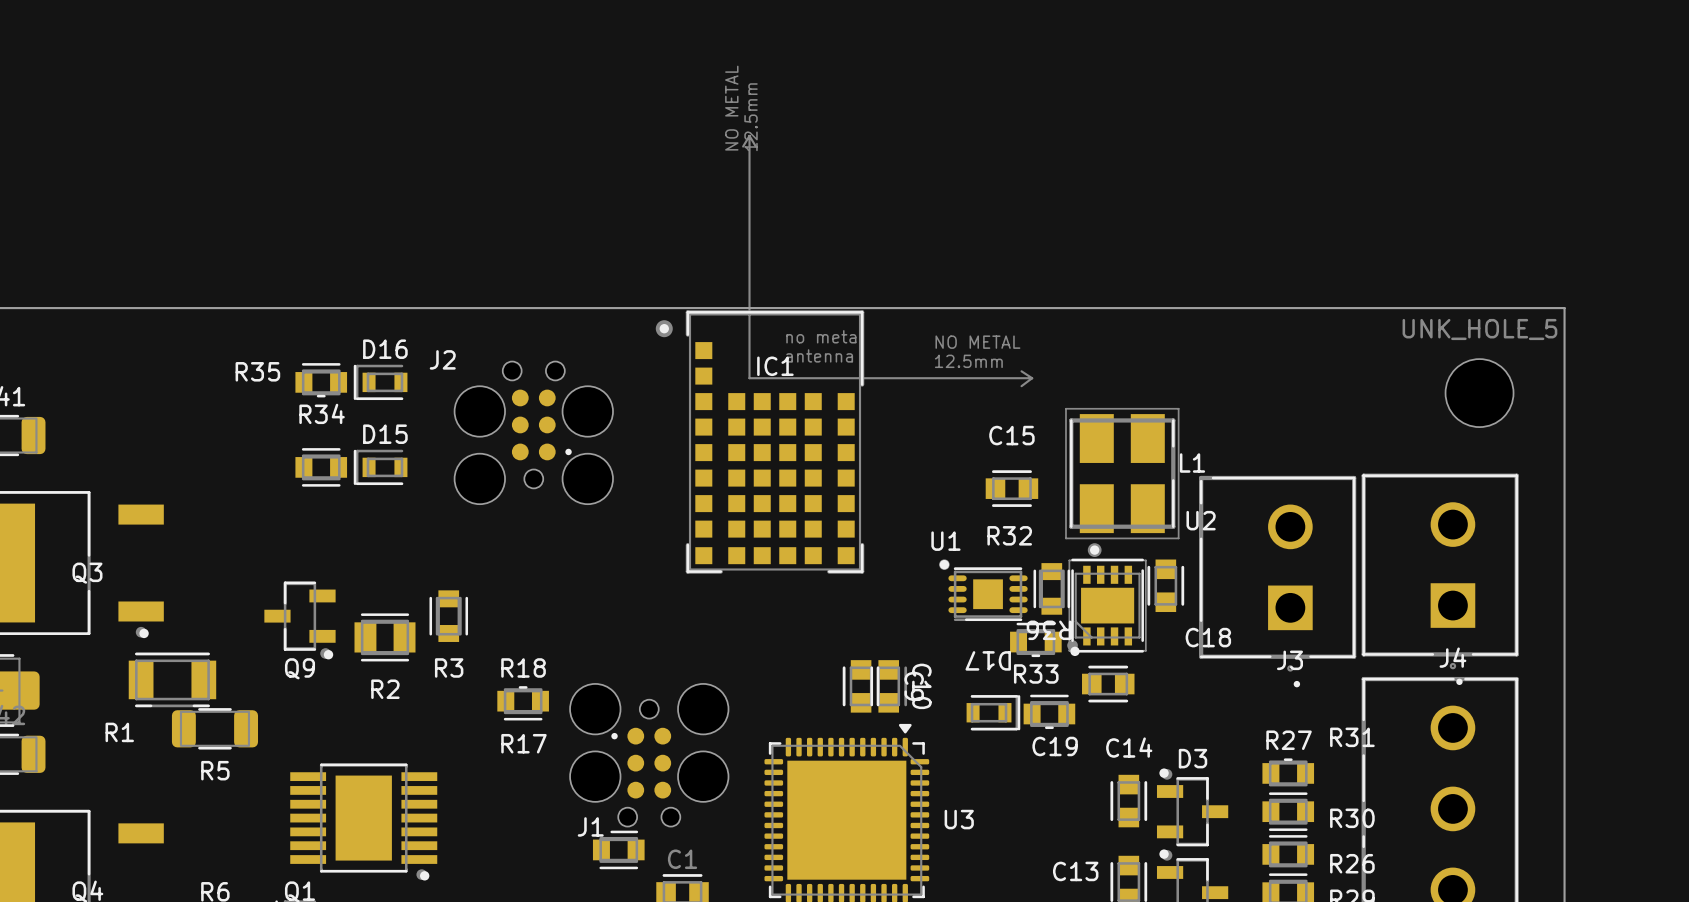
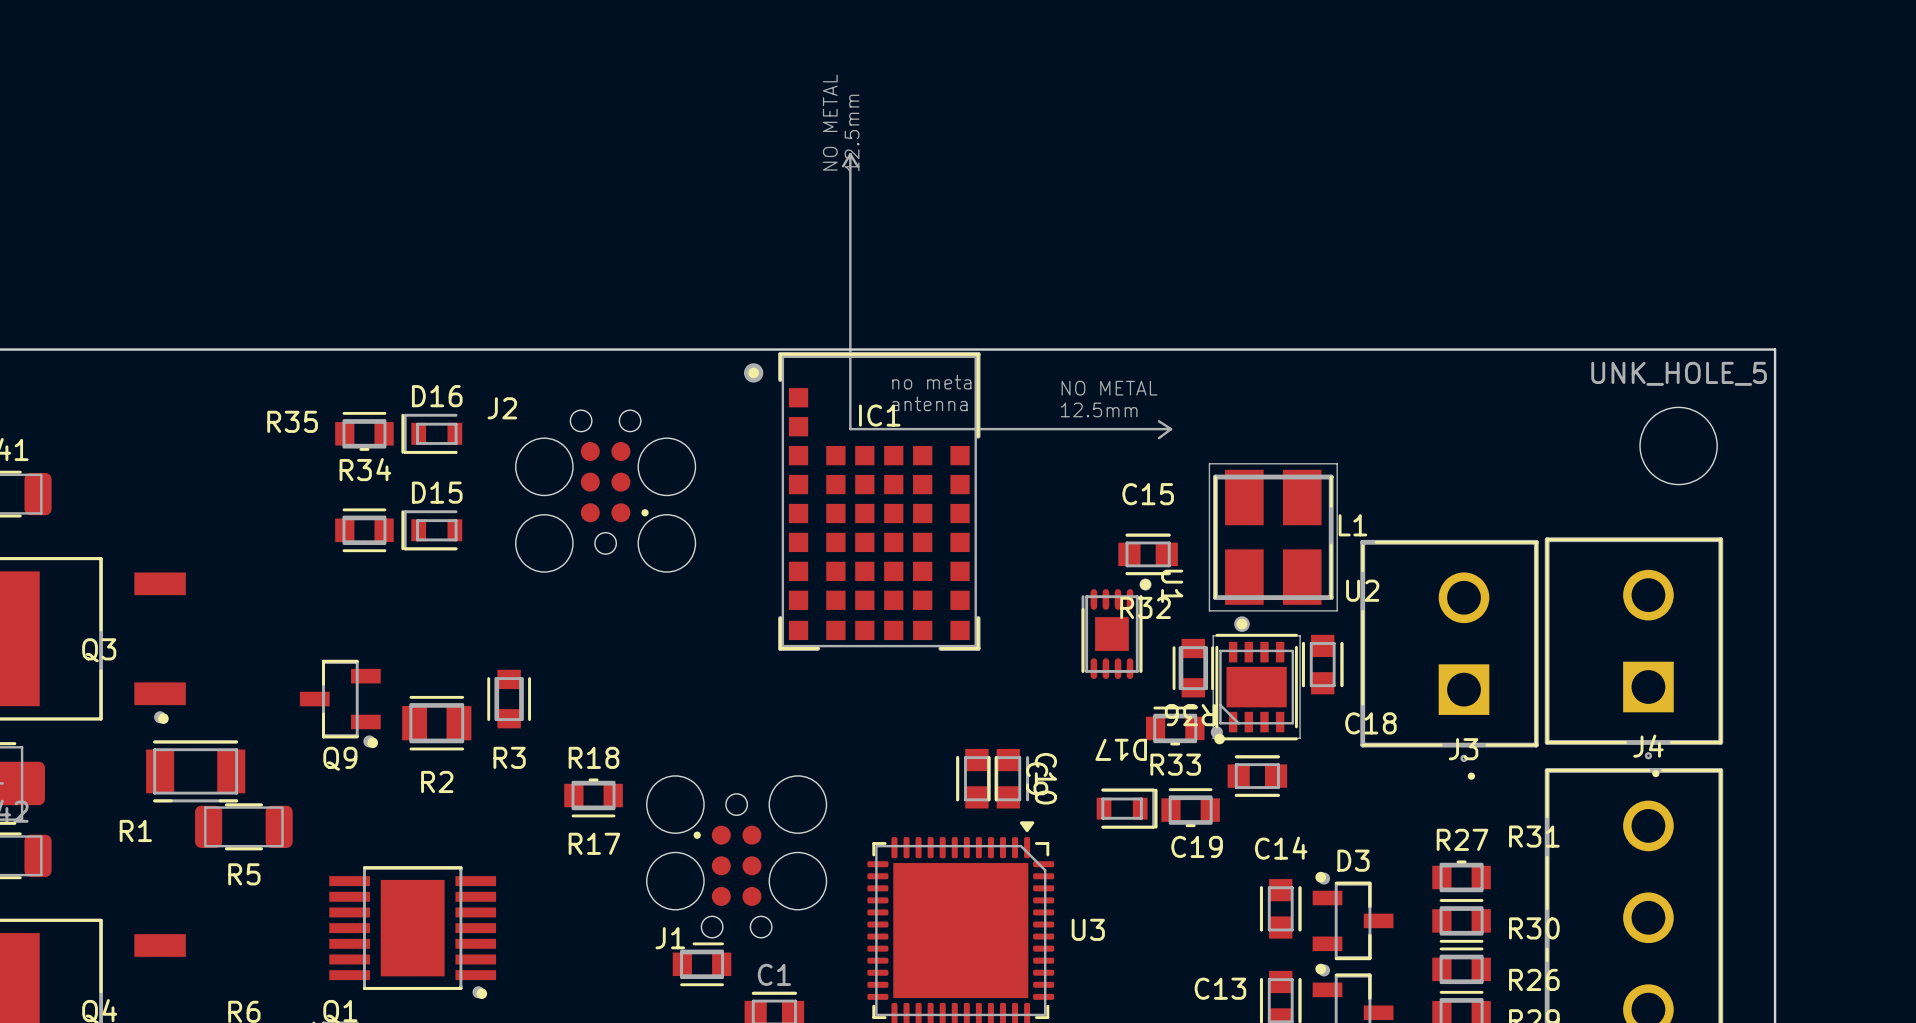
U1 rotation: 0° (983, 590) -> 90° clockwise (1116, 628)

